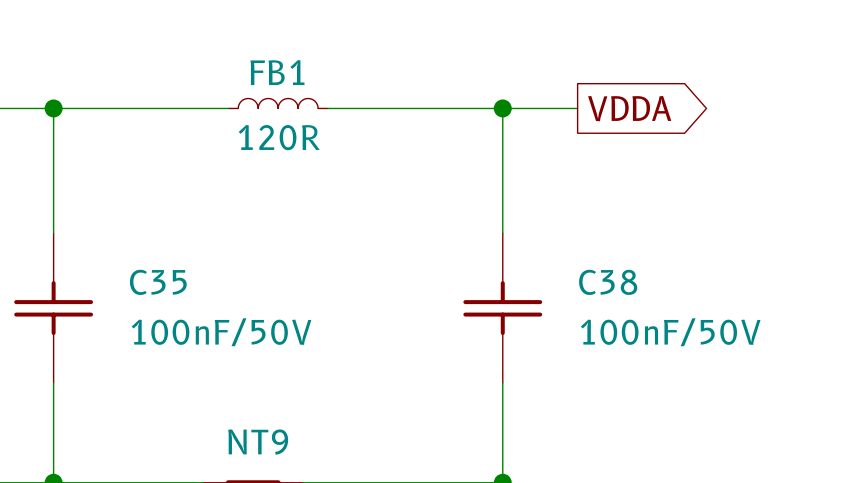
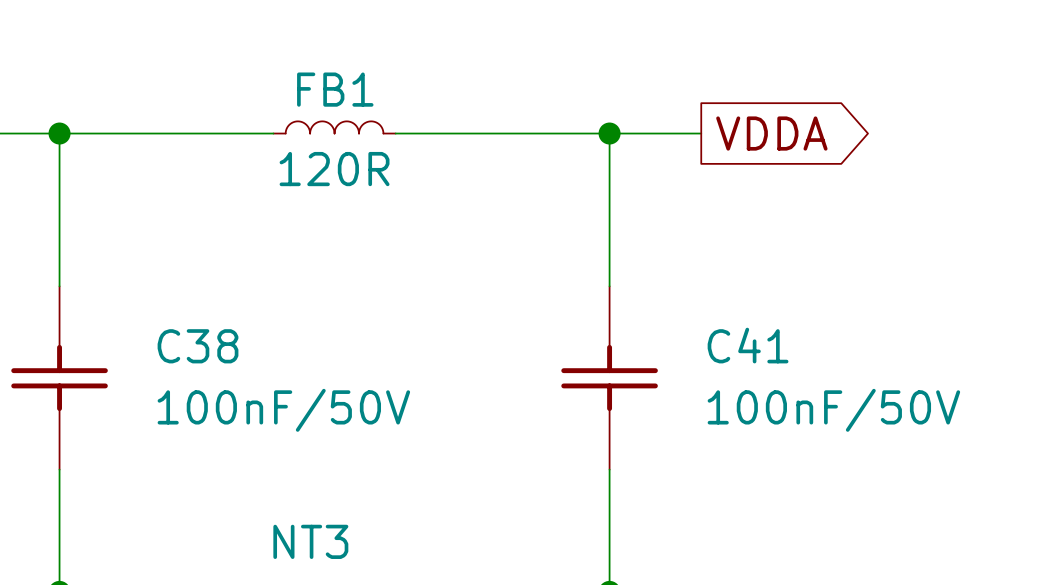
C35 name: C35 (158, 282) -> C38 (198, 346)
C38 name: C38 (608, 282) -> C41 (748, 345)
NT9 name: NT9 (258, 442) -> NT3 (310, 541)

